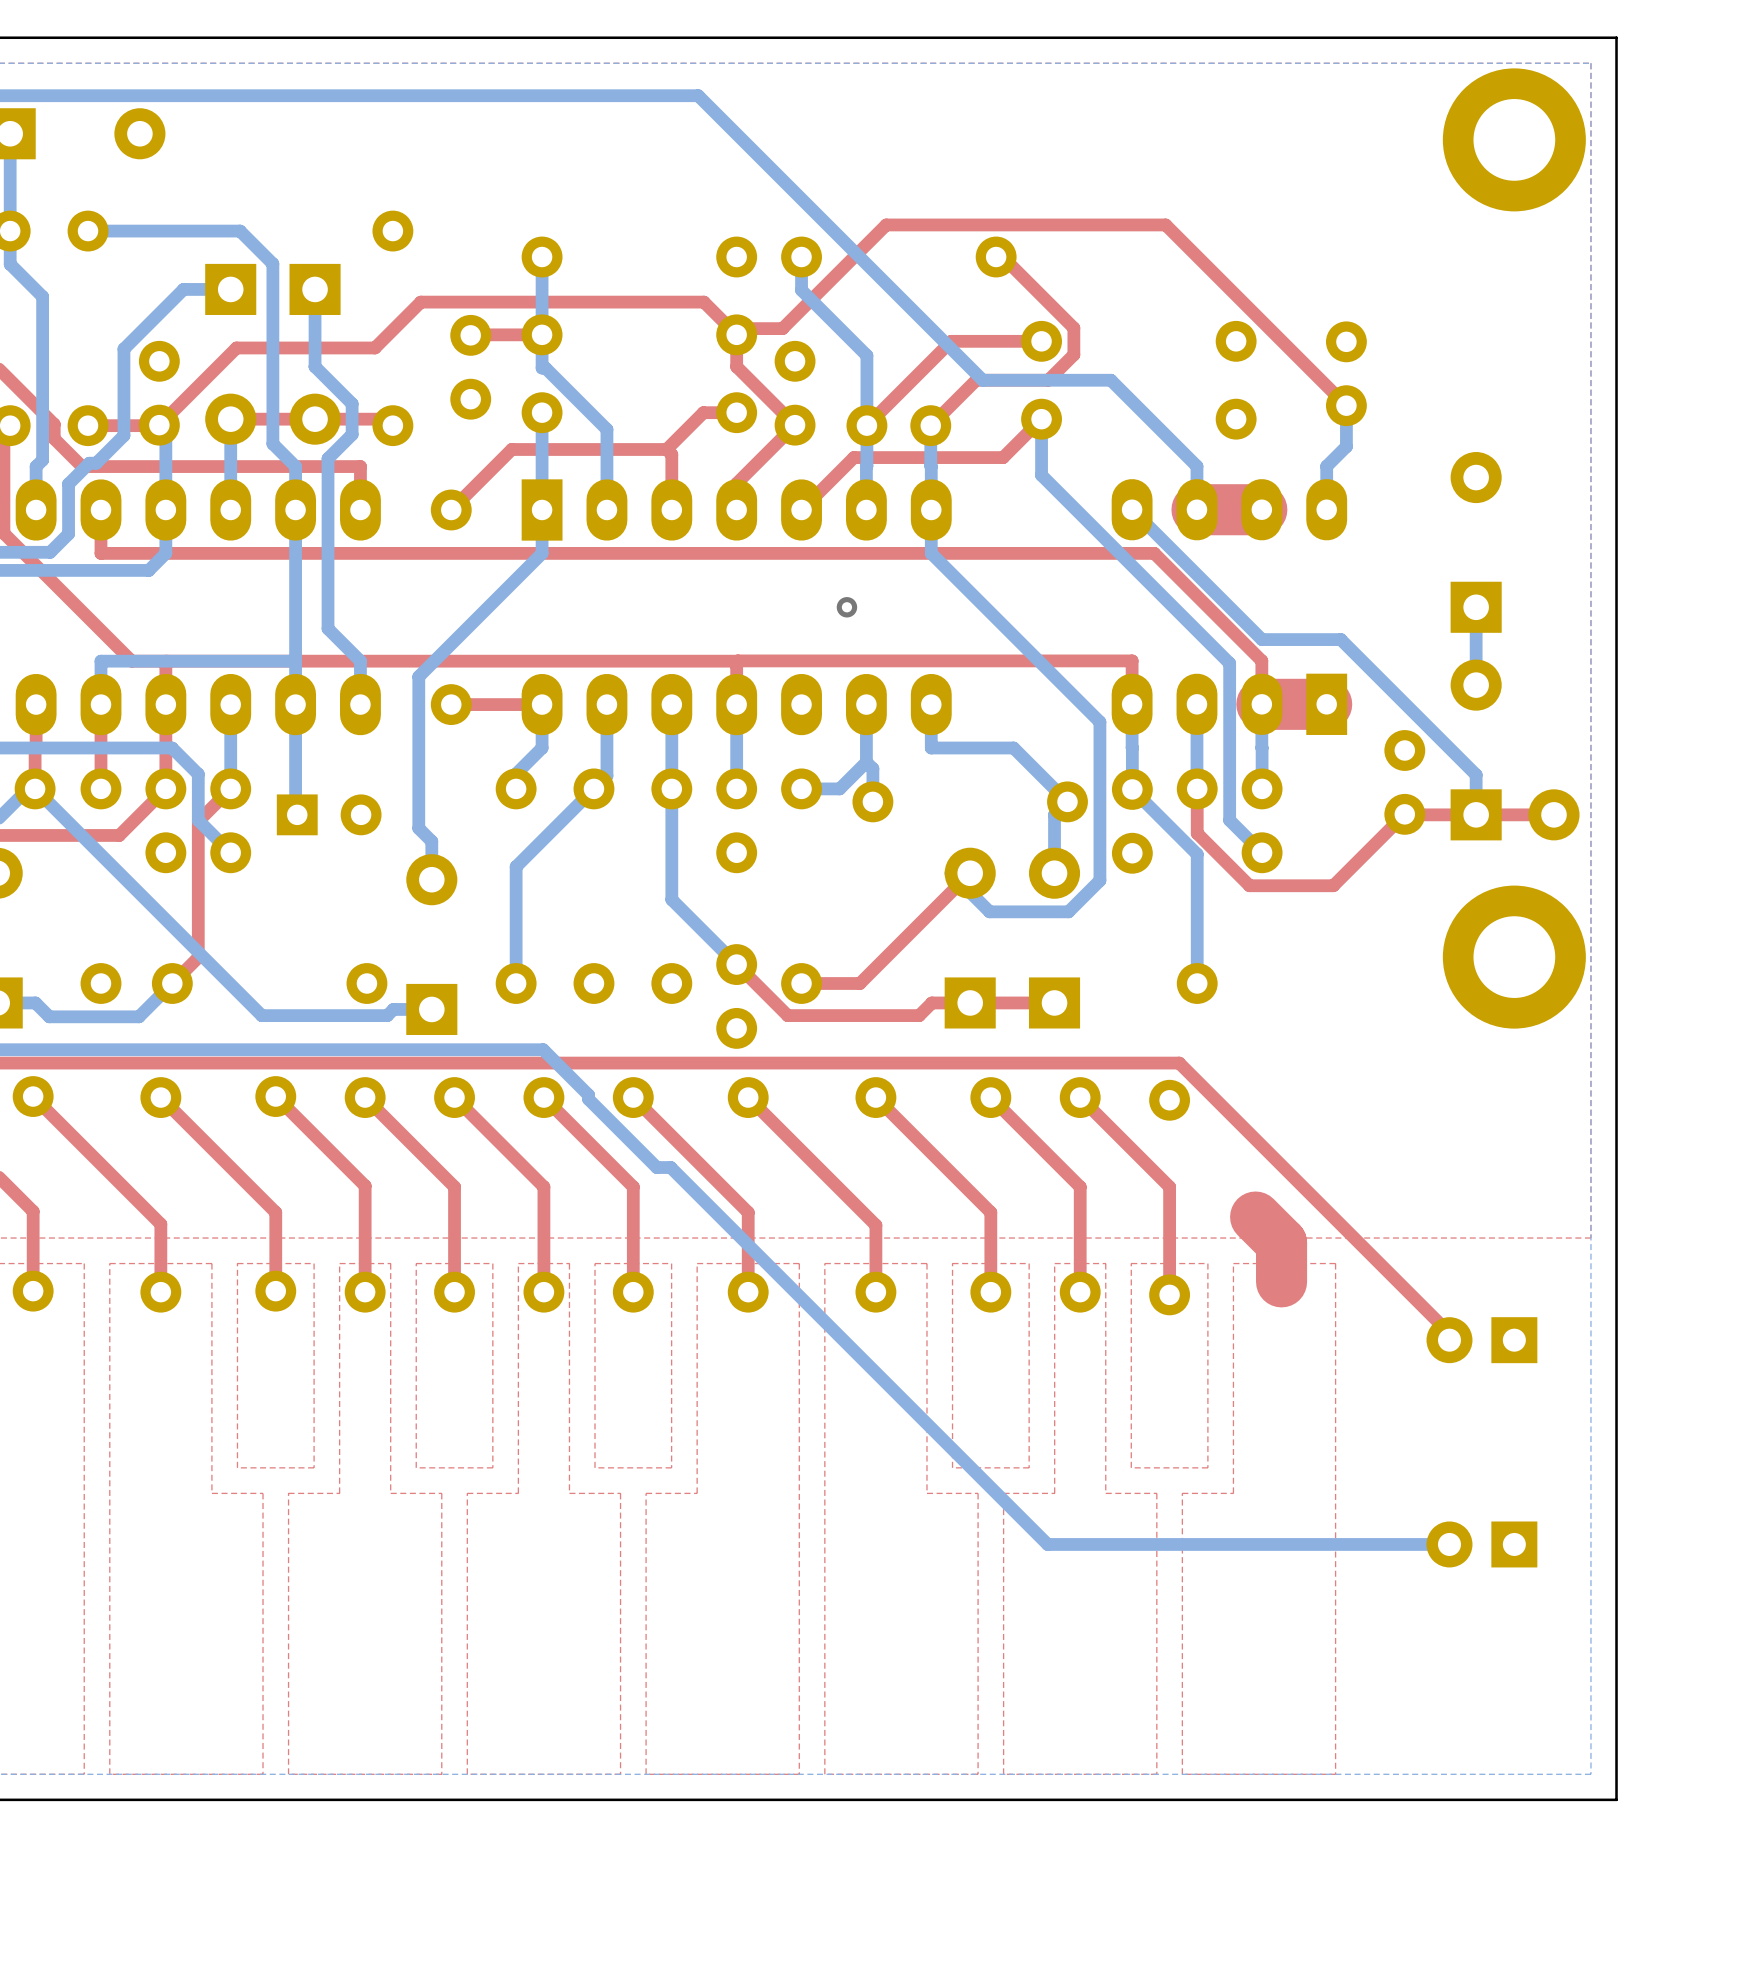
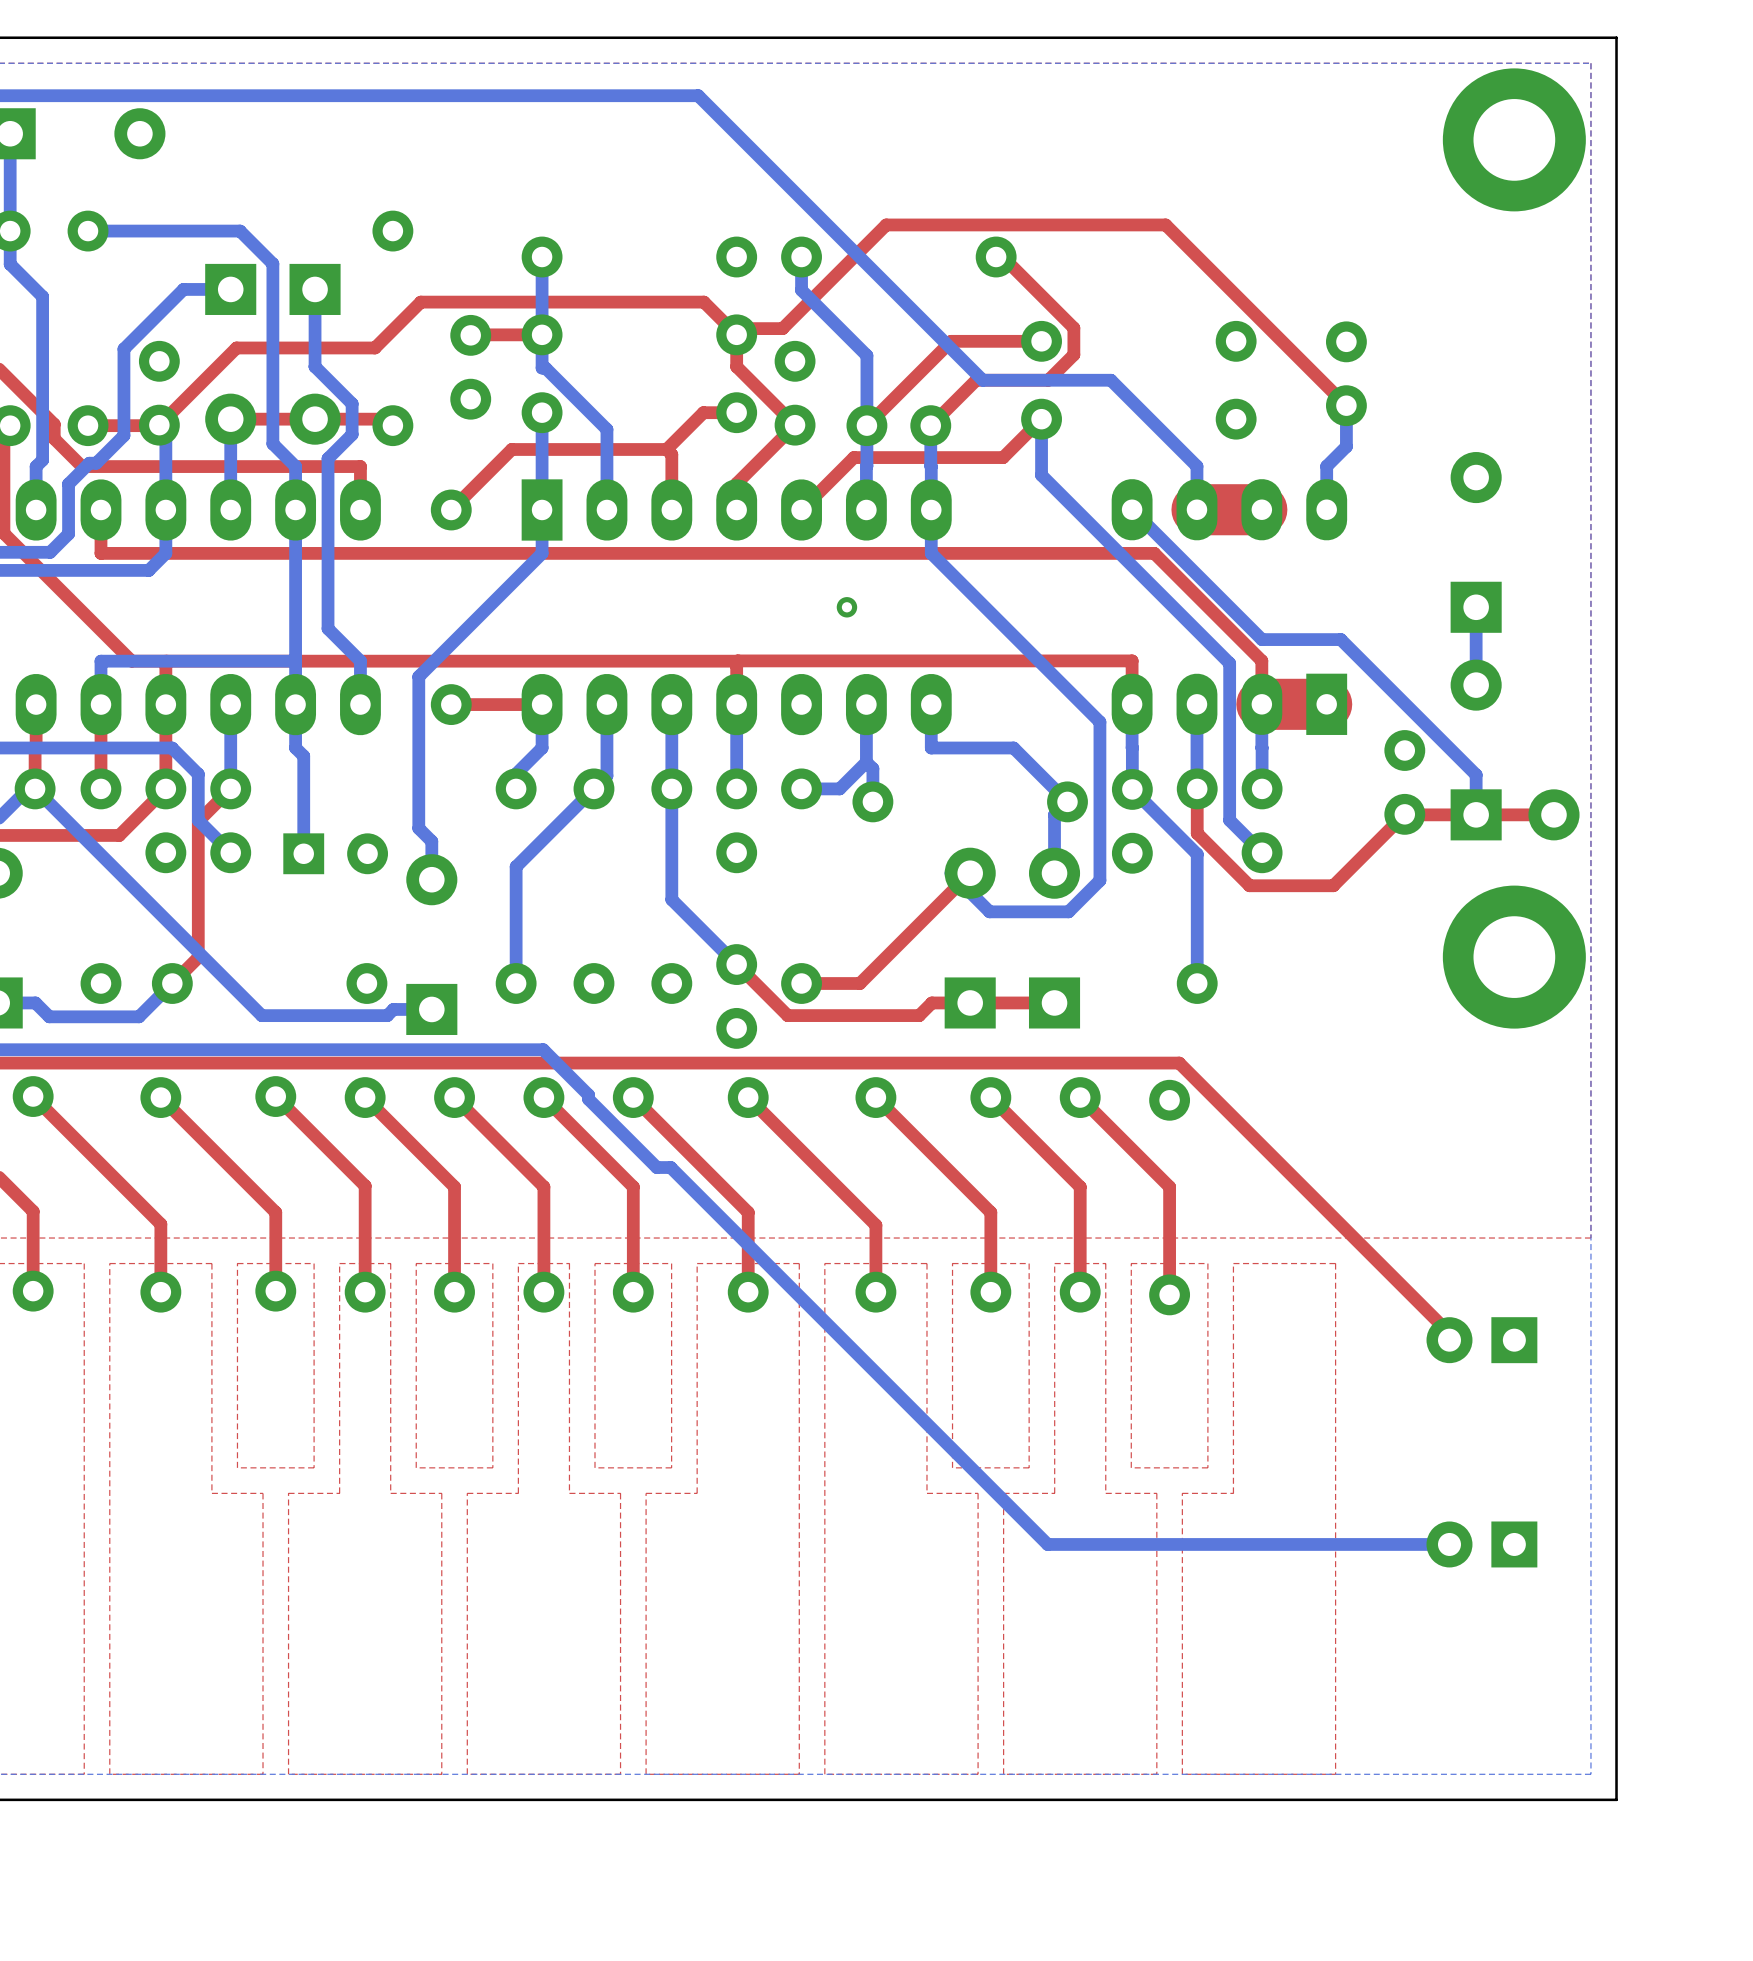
bottom track: (295, 747) (295, 813) (297, 814) -> (295, 747) (303, 756) (303, 853)
part position: (329, 814) -> (335, 853)
top track: (1255, 1217) (1281, 1242) (1281, 1281) -> none

